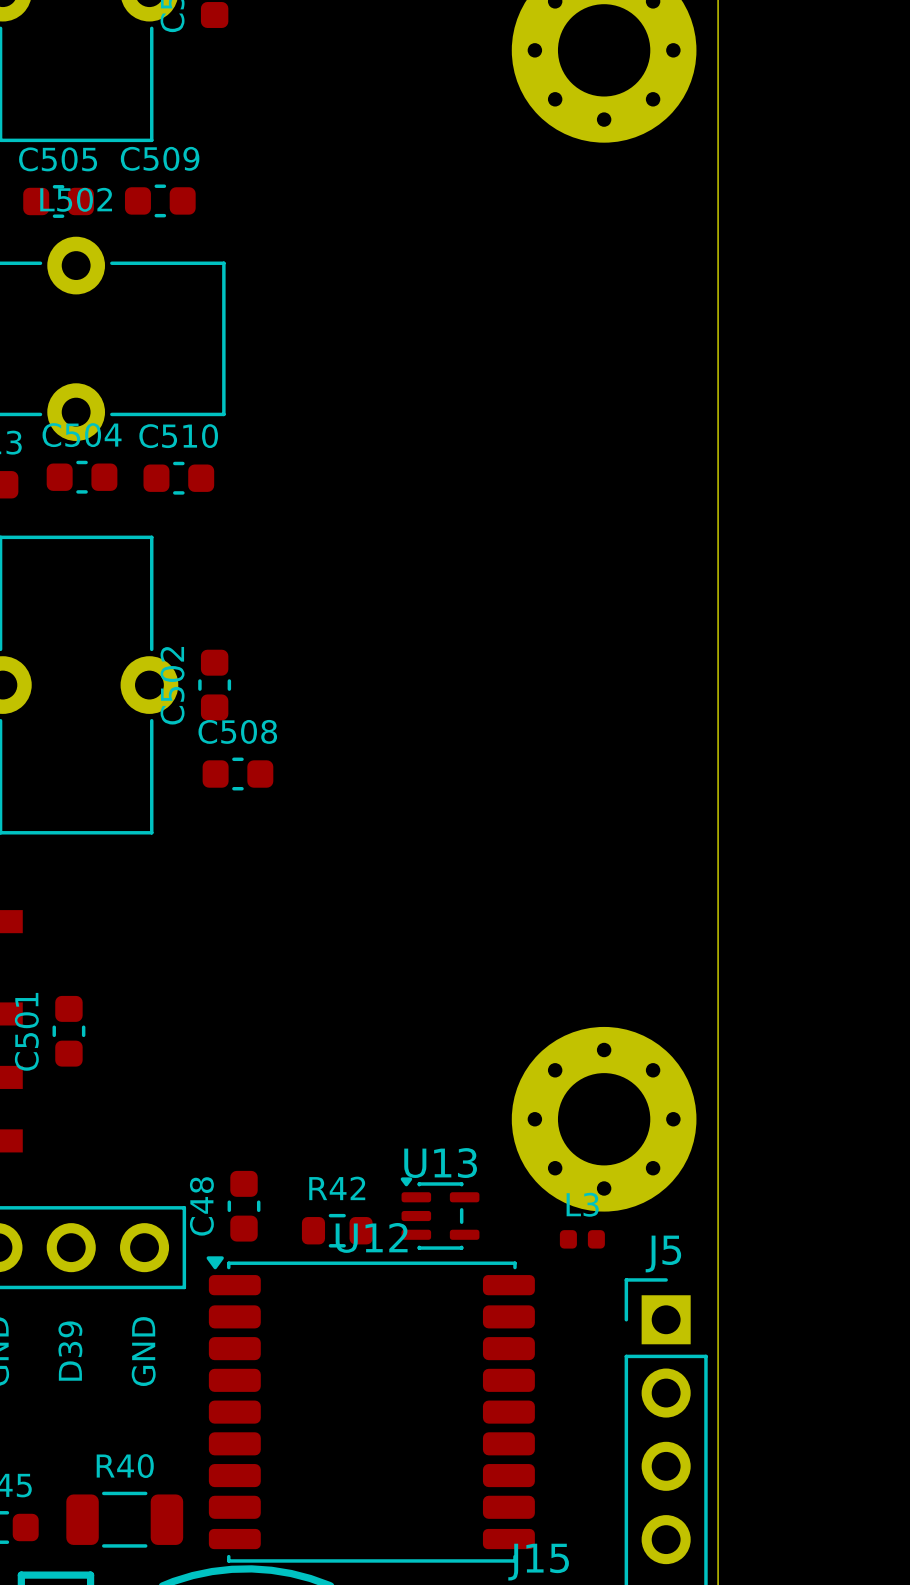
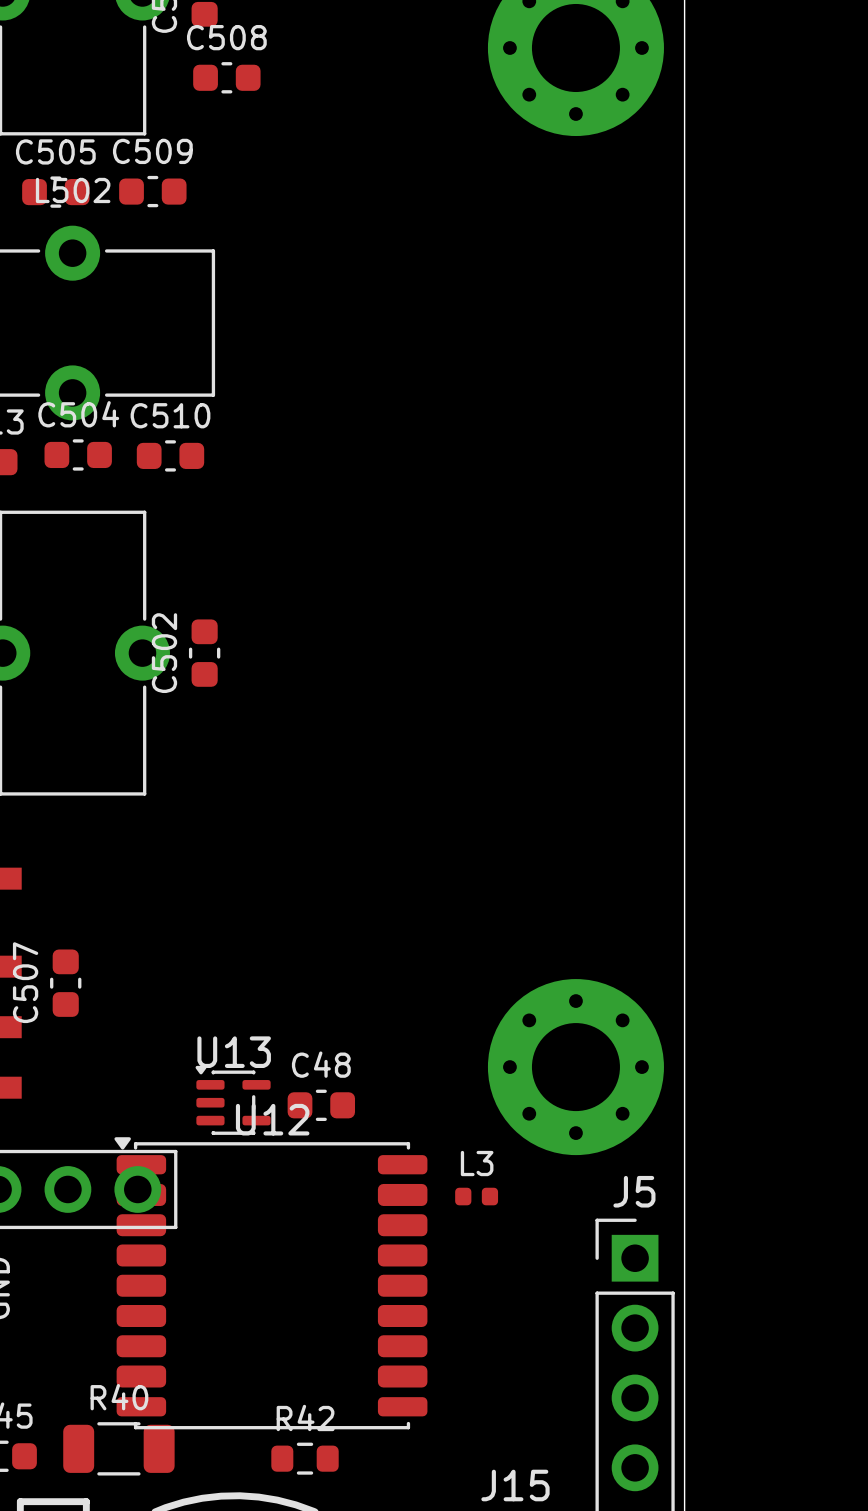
C508 position: (237, 774) -> (226, 77)
C501 name: C501 (26, 1031) -> C507 (25, 982)
C48 rotation: 0° (244, 1206) -> 90° clockwise (321, 1105)
C48 position: (244, 1206) -> (321, 1105)
U13 position: (440, 1213) -> (233, 1100)
R42 position: (337, 1230) -> (305, 1458)
L3 position: (582, 1239) -> (476, 1196)
text: D39 (70, 1351) -> none
text: GND (143, 1351) -> none
U12 position: (370, 1409) -> (270, 1283)

